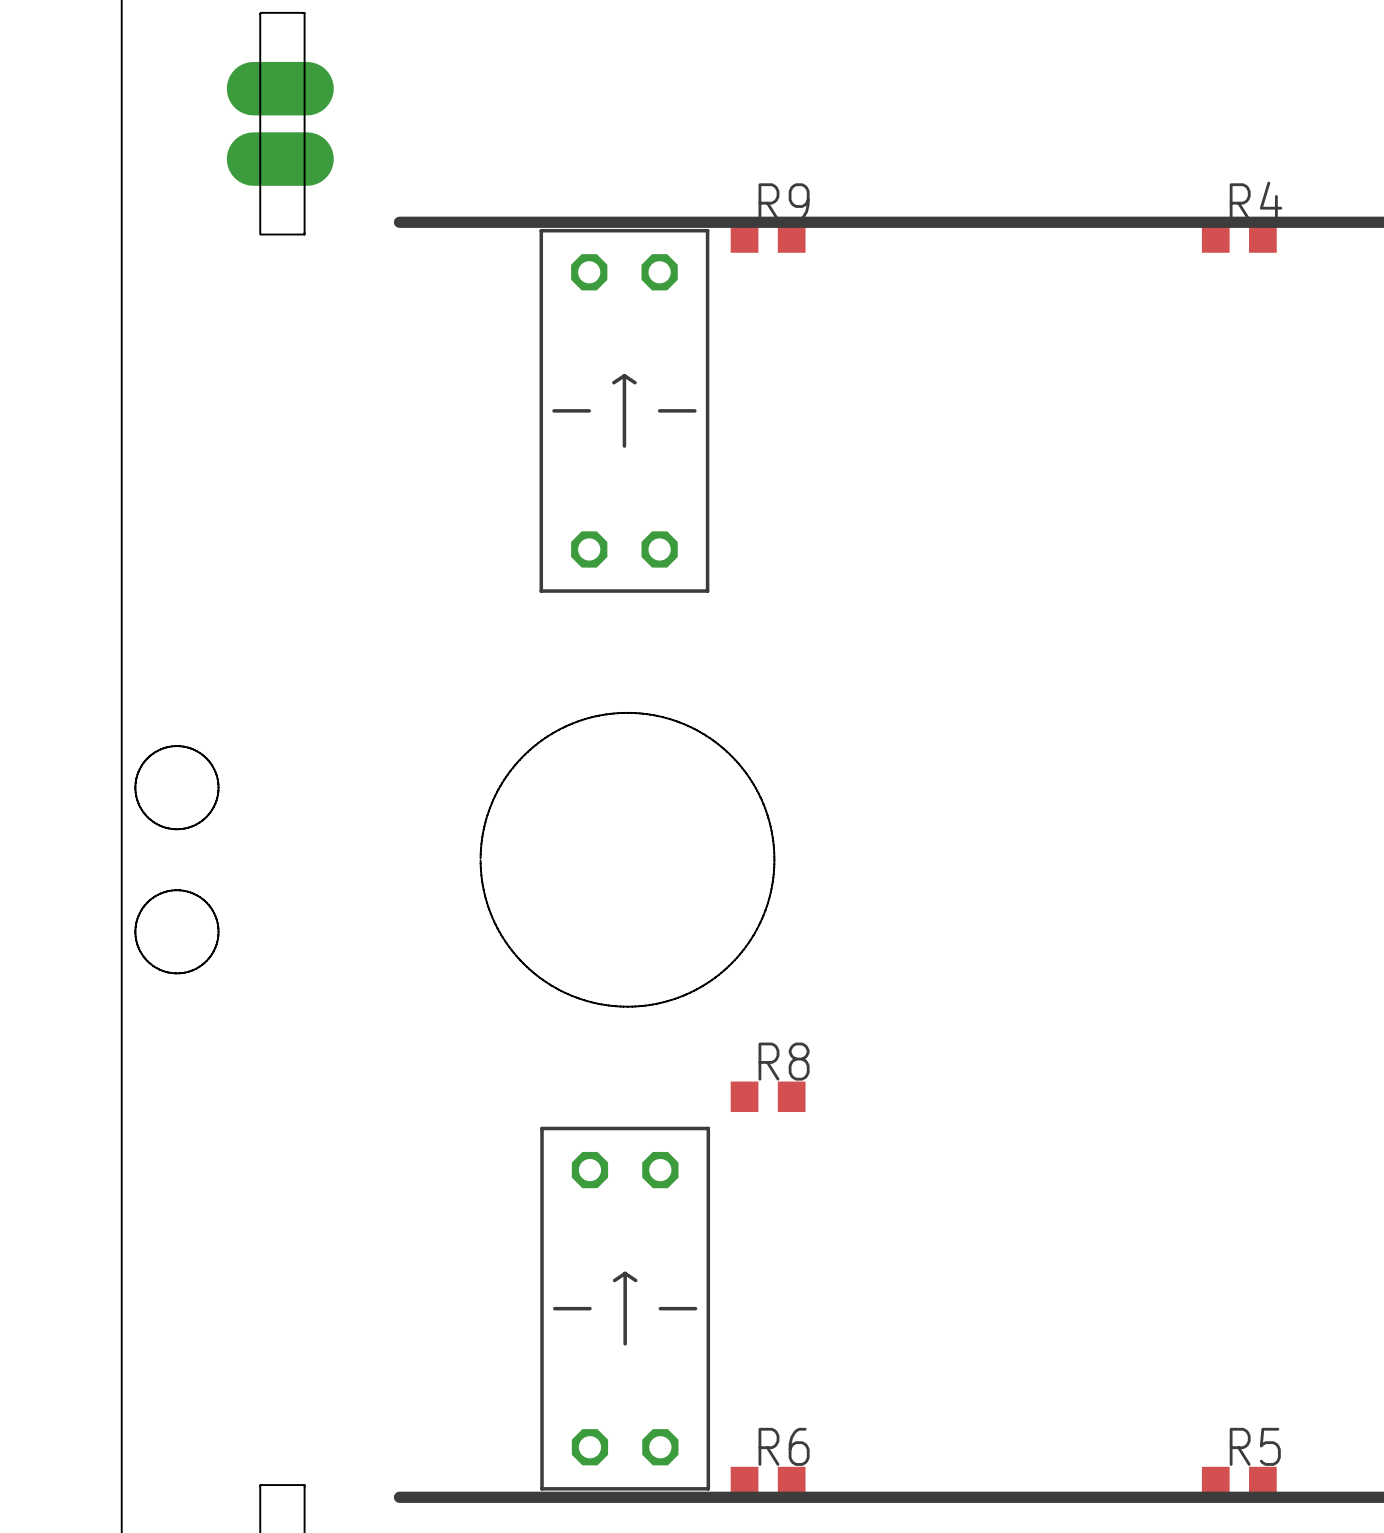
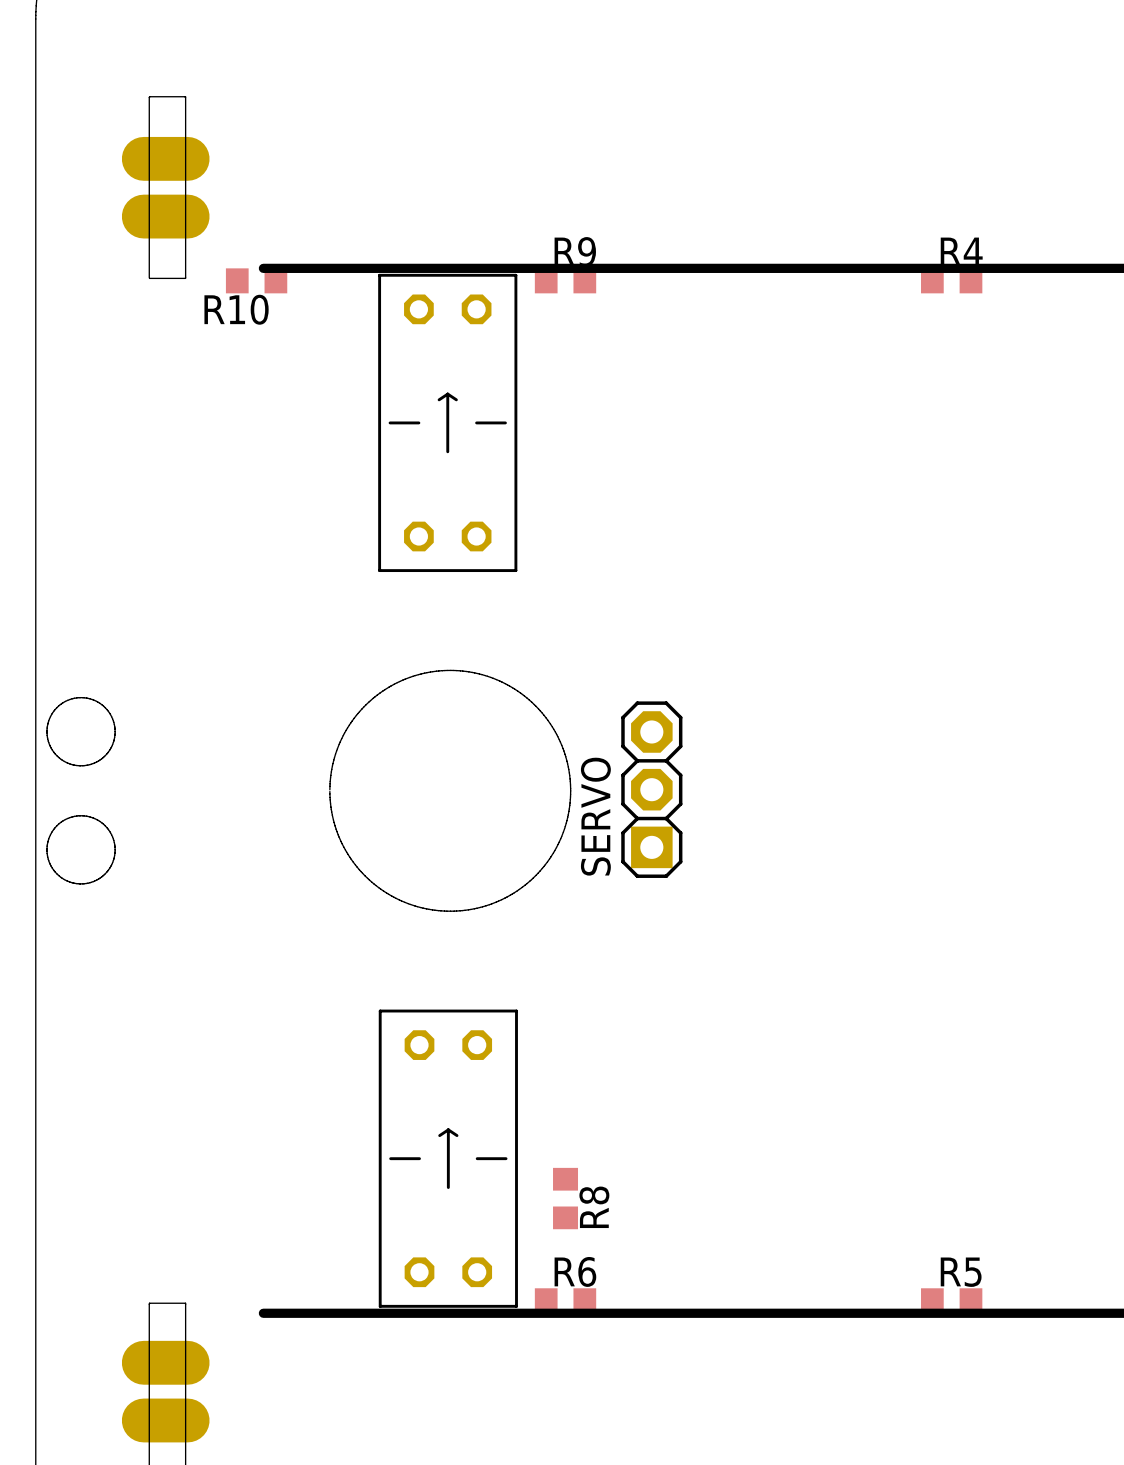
R10: none -> (256, 280)
SERVO: none -> (651, 789)
R8 rotation: 0° (768, 1096) -> 90° clockwise (565, 1198)
R8 position: (768, 1096) -> (565, 1198)

